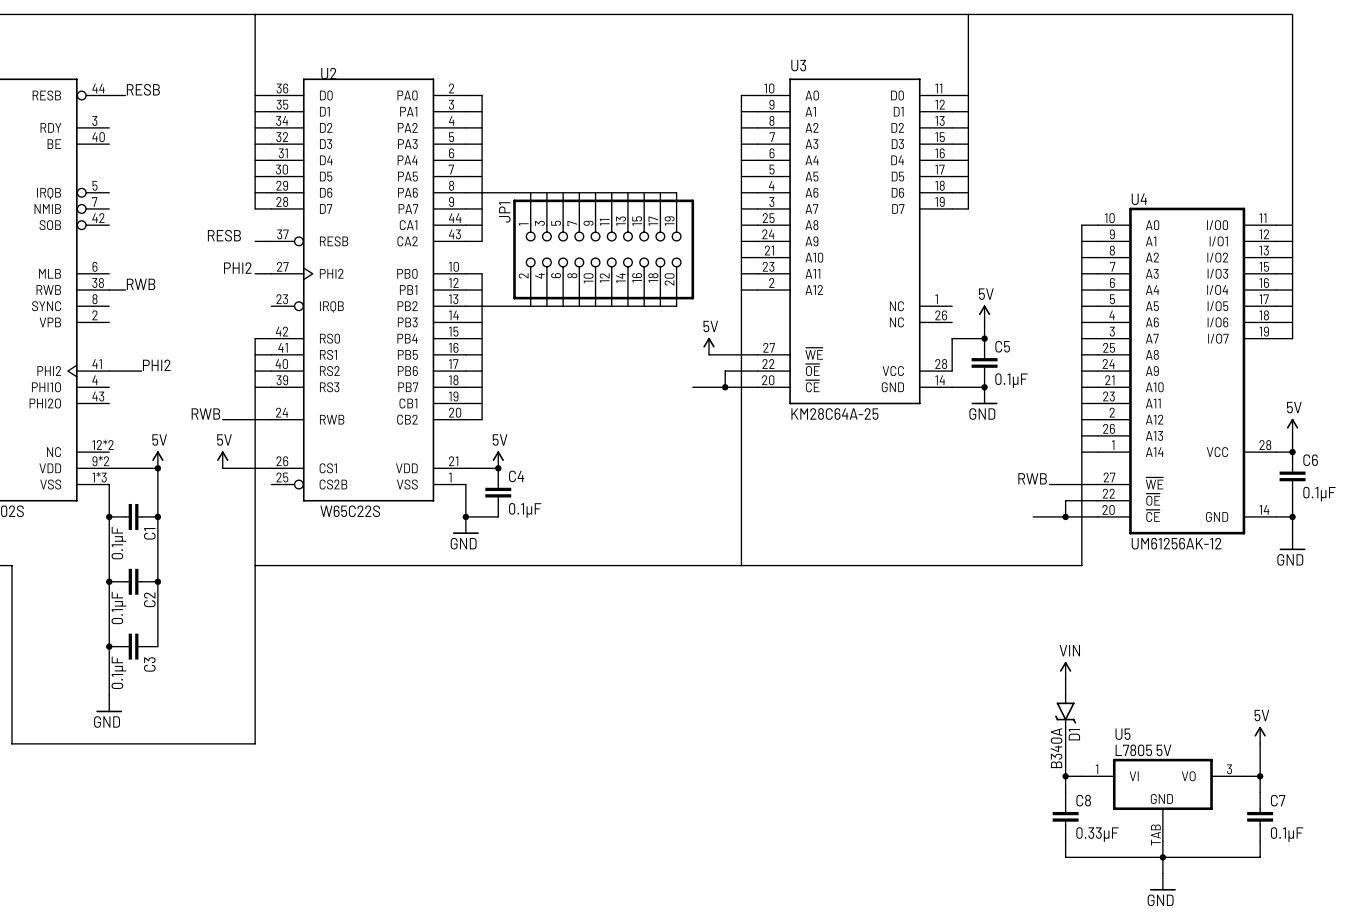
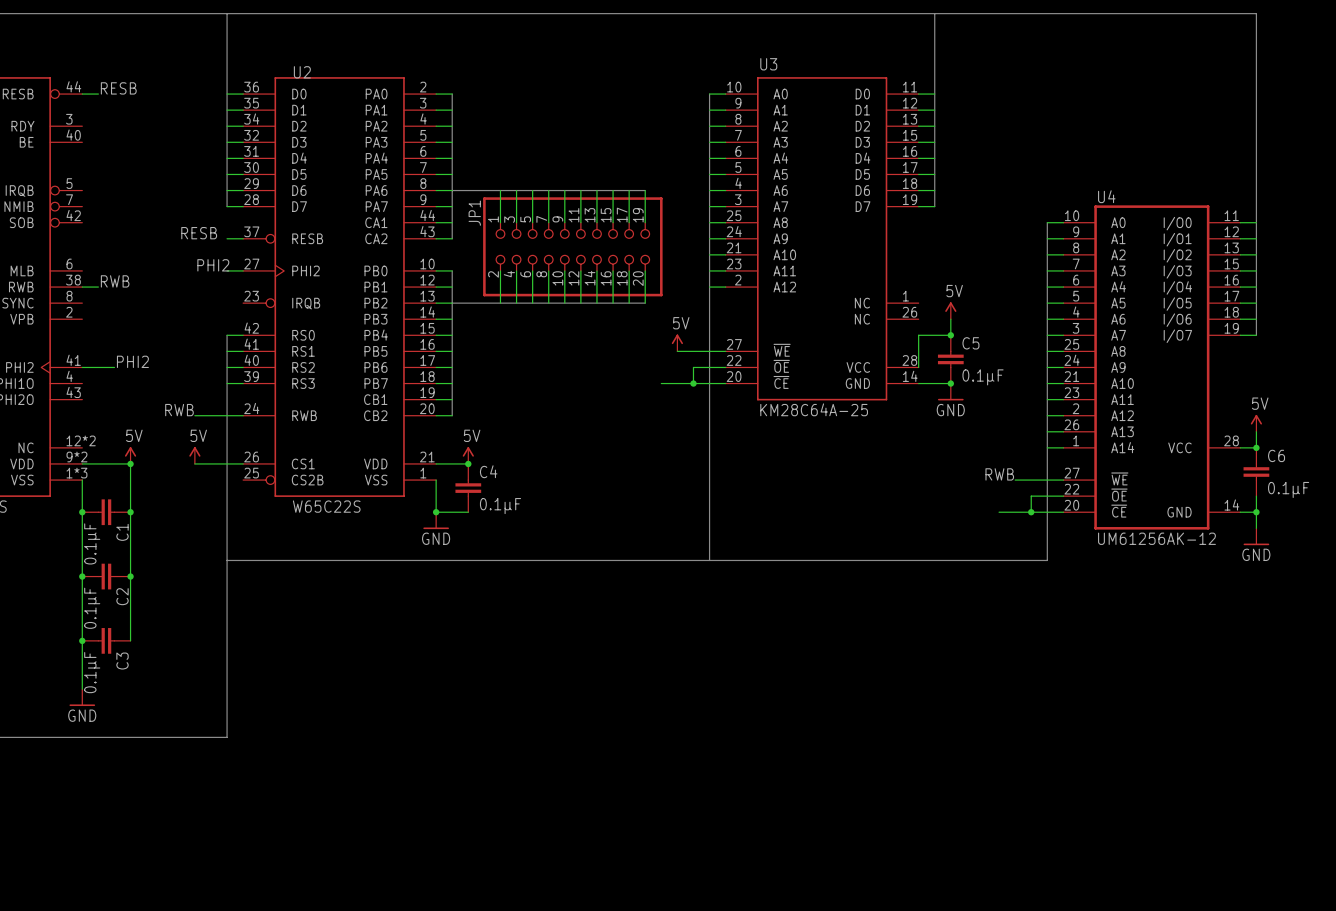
power symbol: VIN (1065, 670) -> none
wire: (1065, 679) (1065, 695) -> none
D1: B340A (1065, 711) -> none
wire: (1065, 727) (1065, 792) -> none
power symbol: 5V (1260, 735) -> none
wire: (1260, 743) (1260, 792) -> none
wire: (1065, 776) (1081, 776) -> none
junction: (1065, 776) -> none
wire: (1243, 776) (1260, 776) -> none
junction: (1260, 776) -> none
U5: L7805 5V (1162, 799) -> none
C8: 0.33μF (1065, 816) -> none
C7: 0.1μF (1260, 816) -> none
wire: (1065, 841) (1065, 857) (1260, 857) (1260, 841) -> none
wire: (1162, 841) (1162, 873) -> none
junction: (1162, 857) -> none
power symbol: GND (1162, 882) -> none

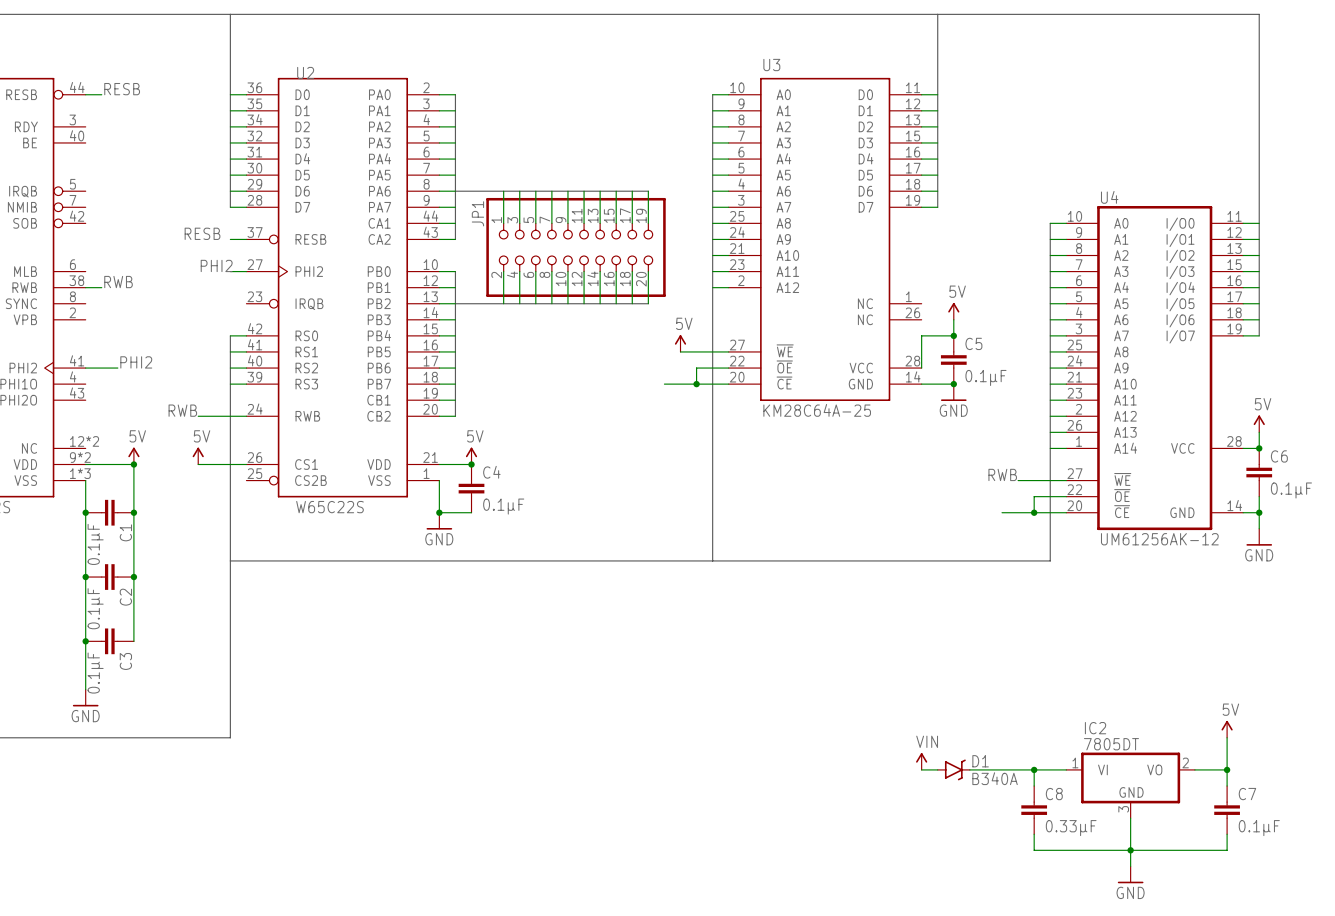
power symbol: none -> 5V (1227, 729)
wire: none -> (1227, 737) (1227, 786)
power symbol: none -> VIN (921, 761)
wire: none -> (921, 769) (937, 769)
D1: none -> B340A (953, 769)
wire: none -> (969, 769) (1066, 769)
wire: none -> (1034, 769) (1034, 786)
junction: none -> (1034, 769)
wire: none -> (1194, 769) (1227, 769)
junction: none -> (1227, 769)
IC2: none -> 7805DT (1130, 785)
C8: none -> 0.33μF (1034, 810)
C7: none -> 0.1μF (1227, 810)
wire: none -> (1130, 818) (1130, 866)
wire: none -> (1034, 834) (1034, 850) (1227, 850) (1227, 834)
junction: none -> (1130, 850)
power symbol: none -> GND (1130, 874)

